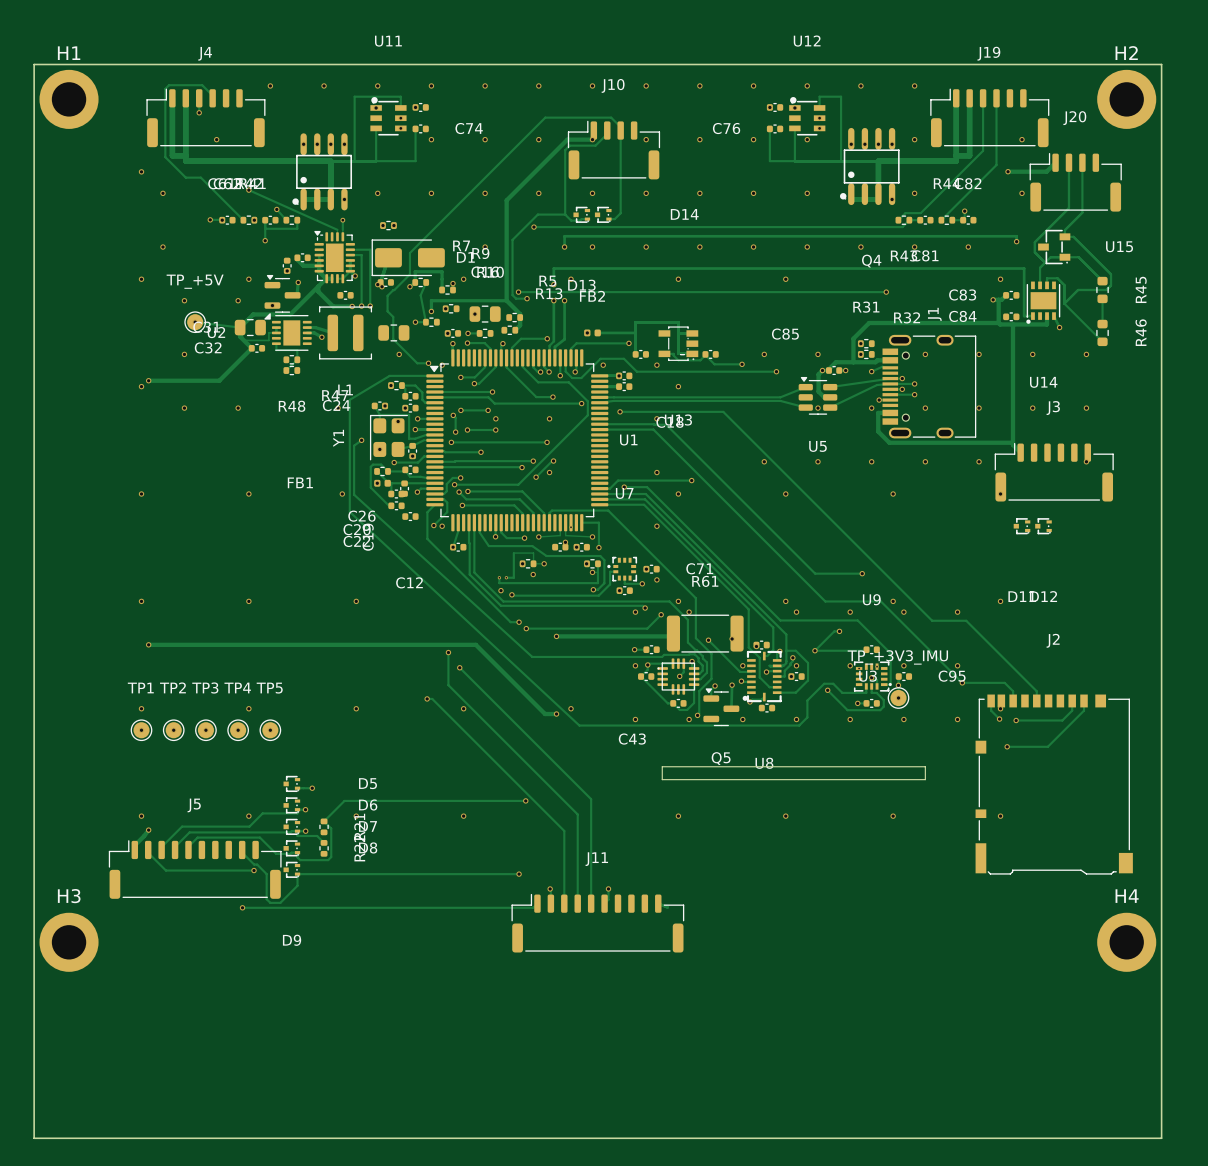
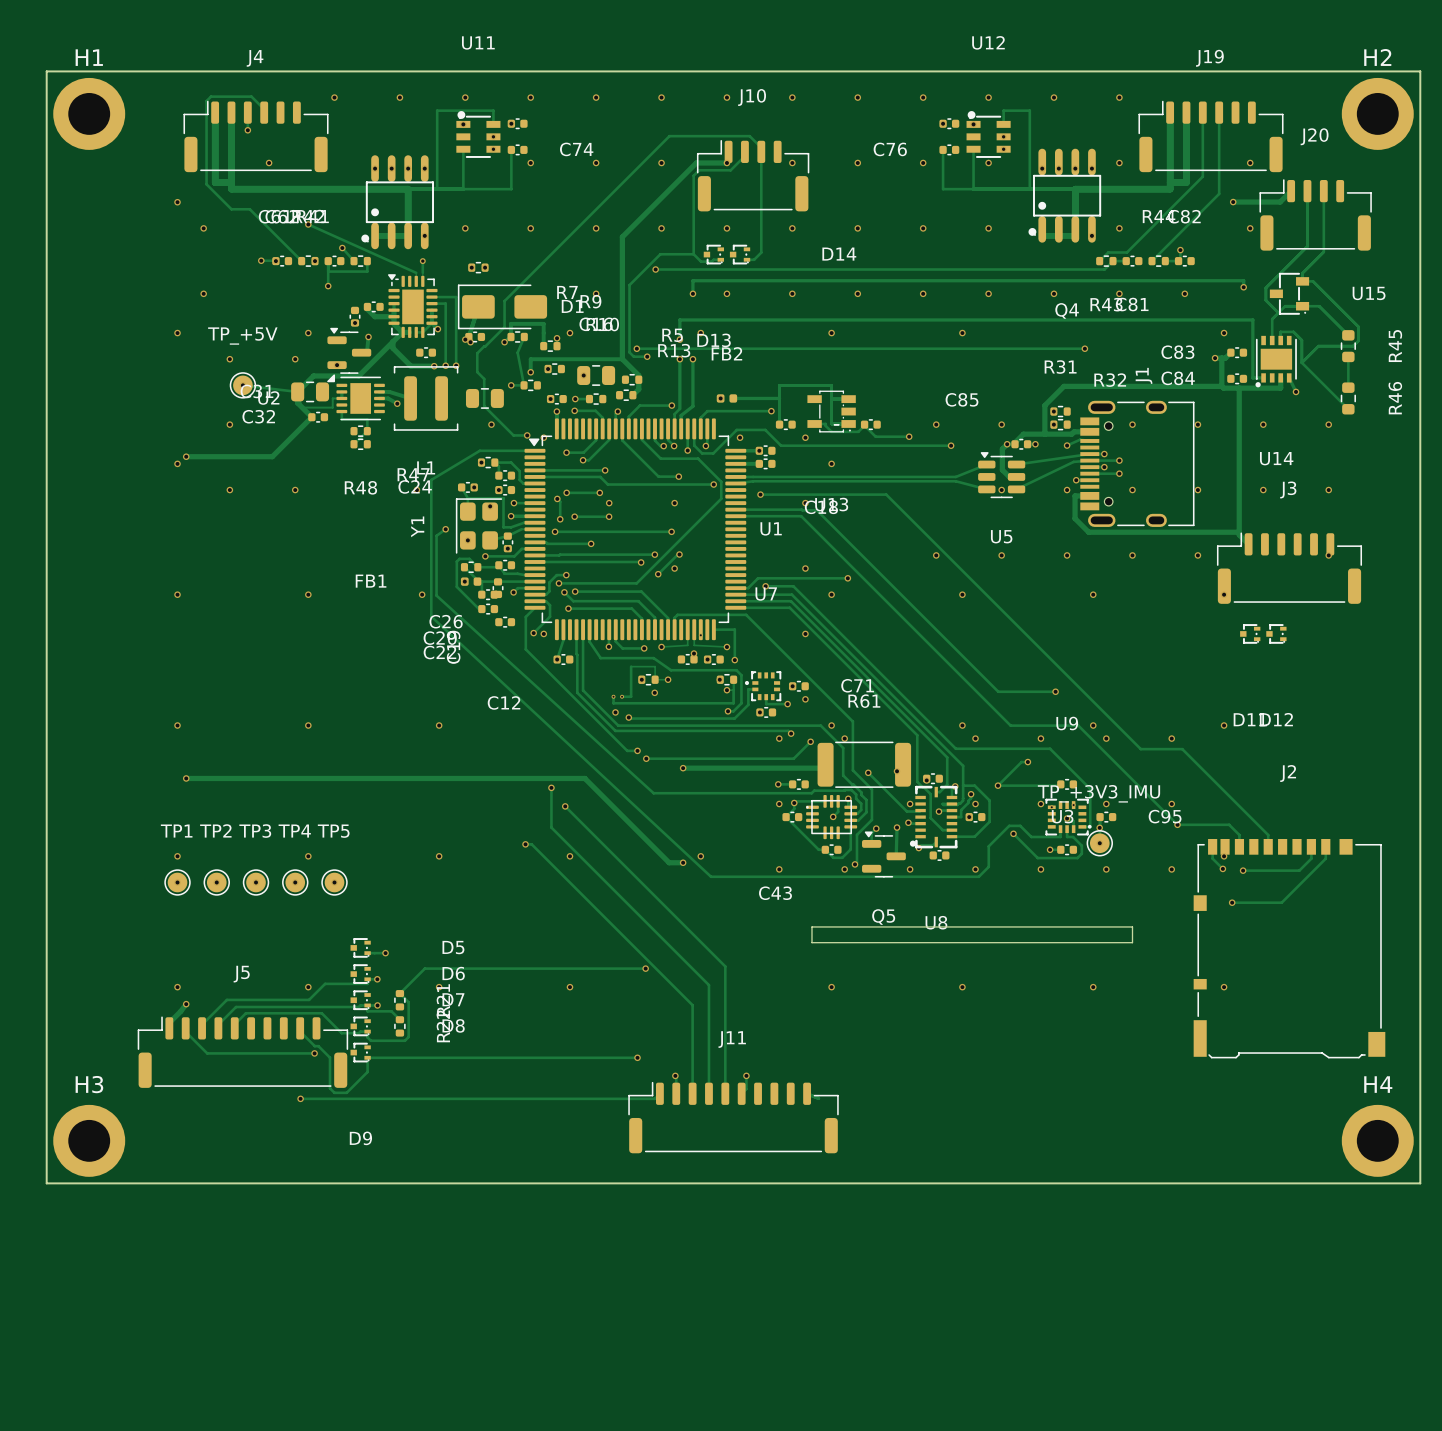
board edge: (34, 977) (34, 1138) (1161, 1138) (1161, 977) -> (46, 1183) (1420, 1183)

